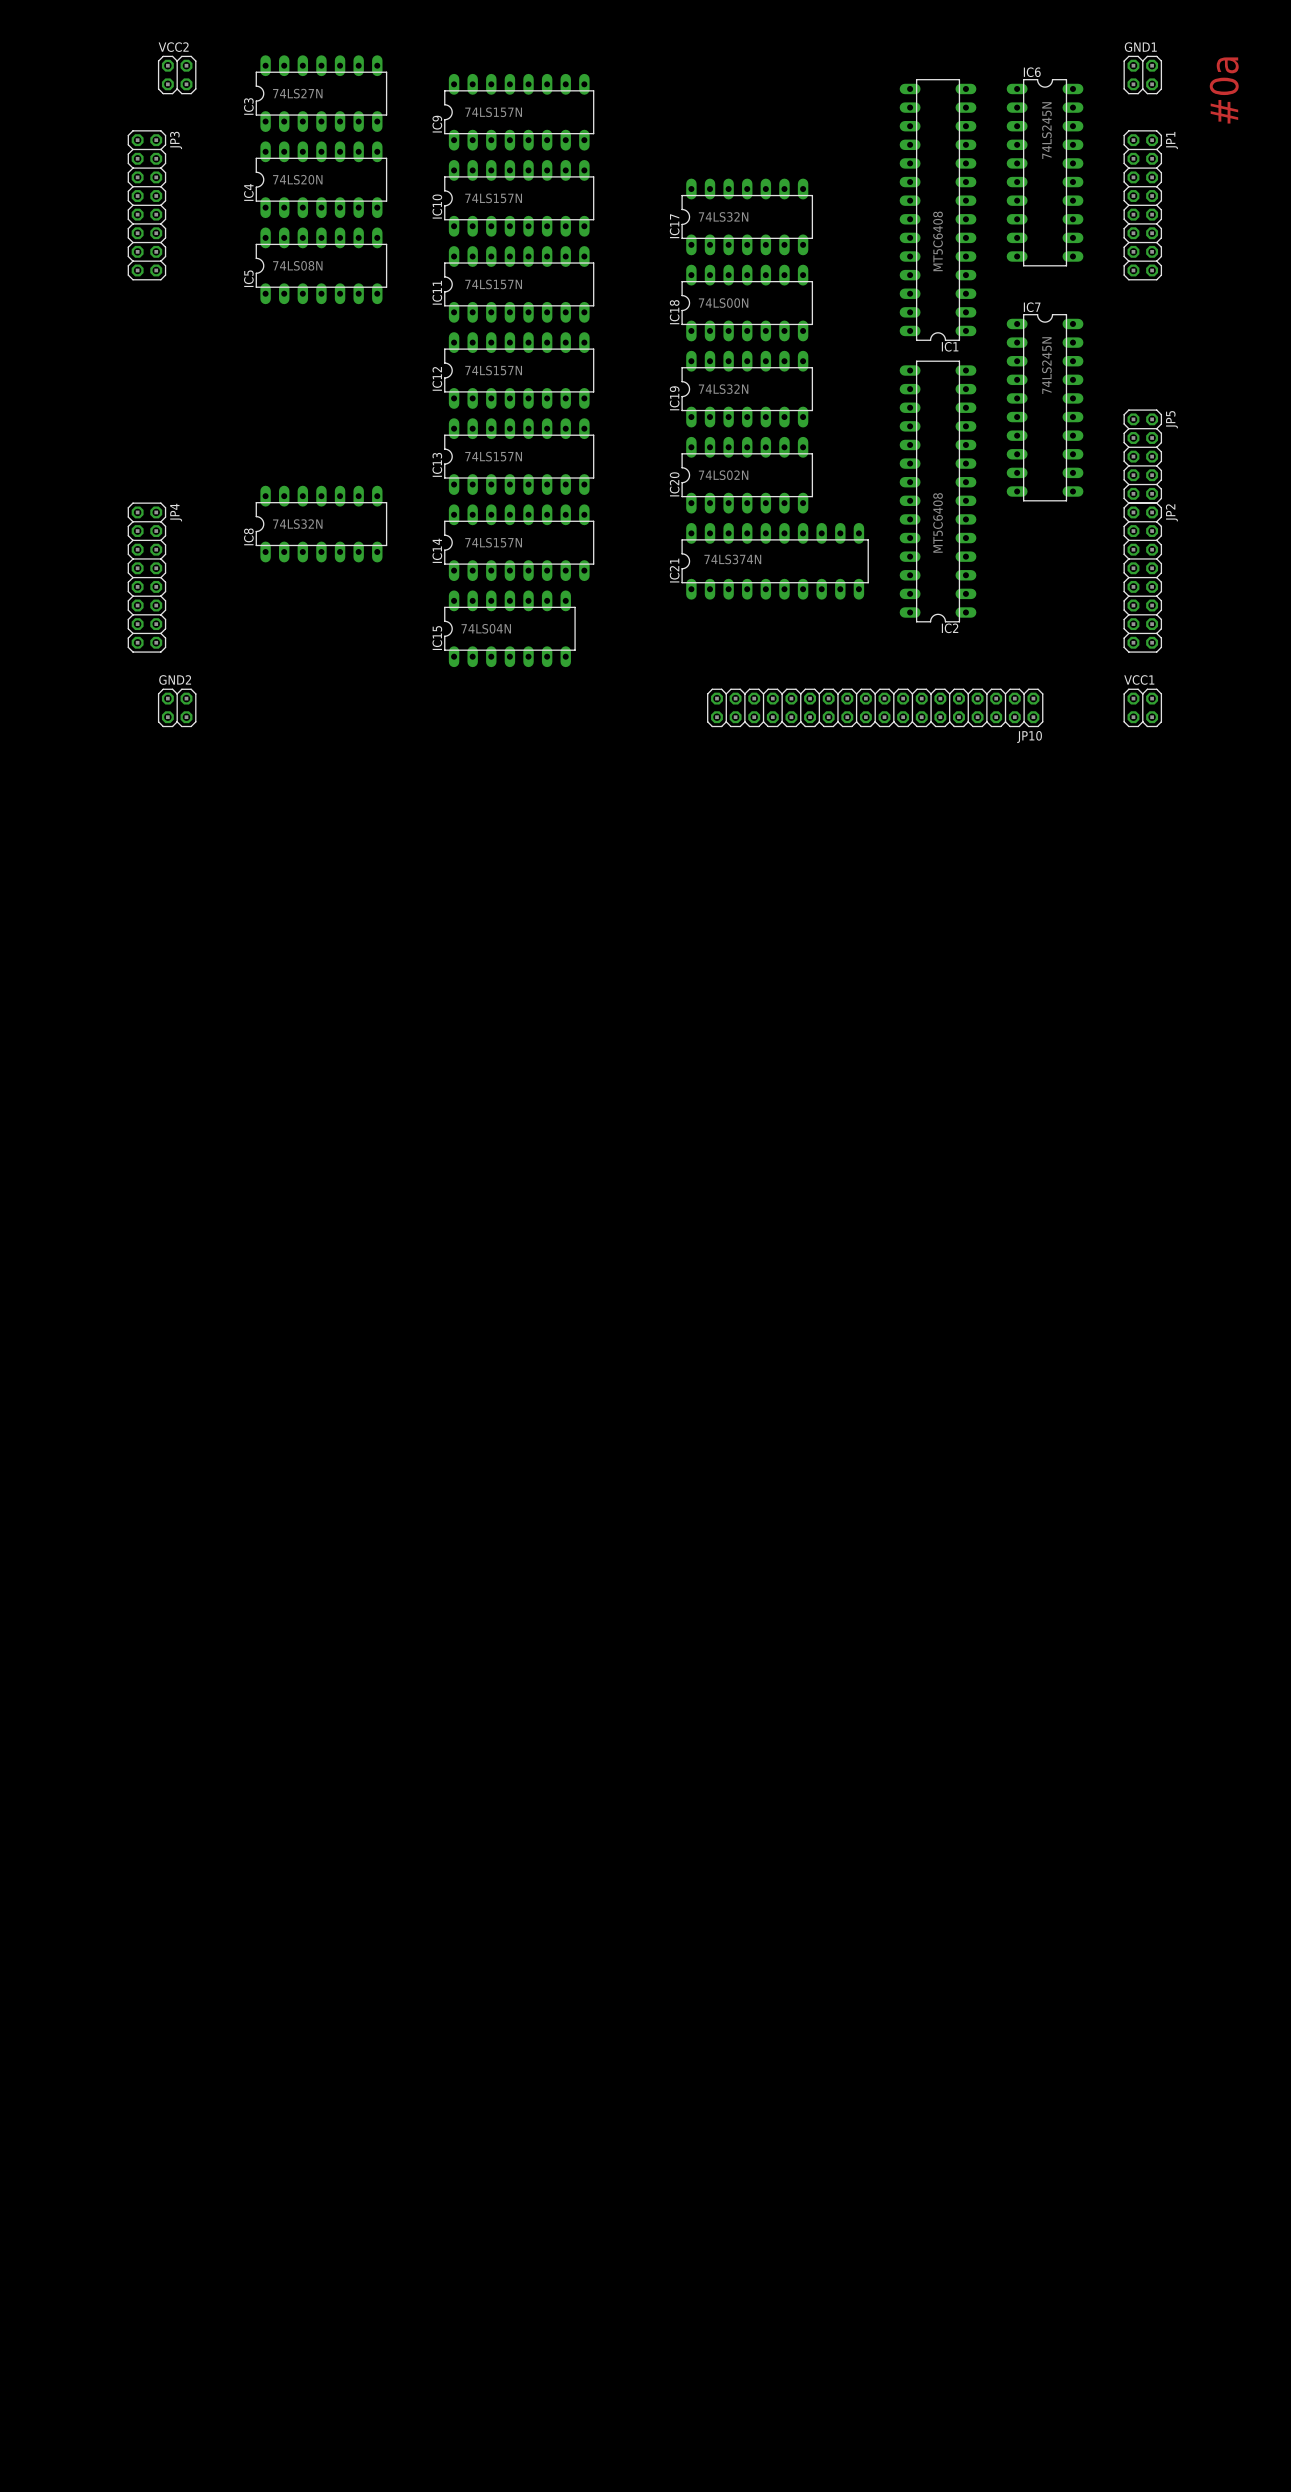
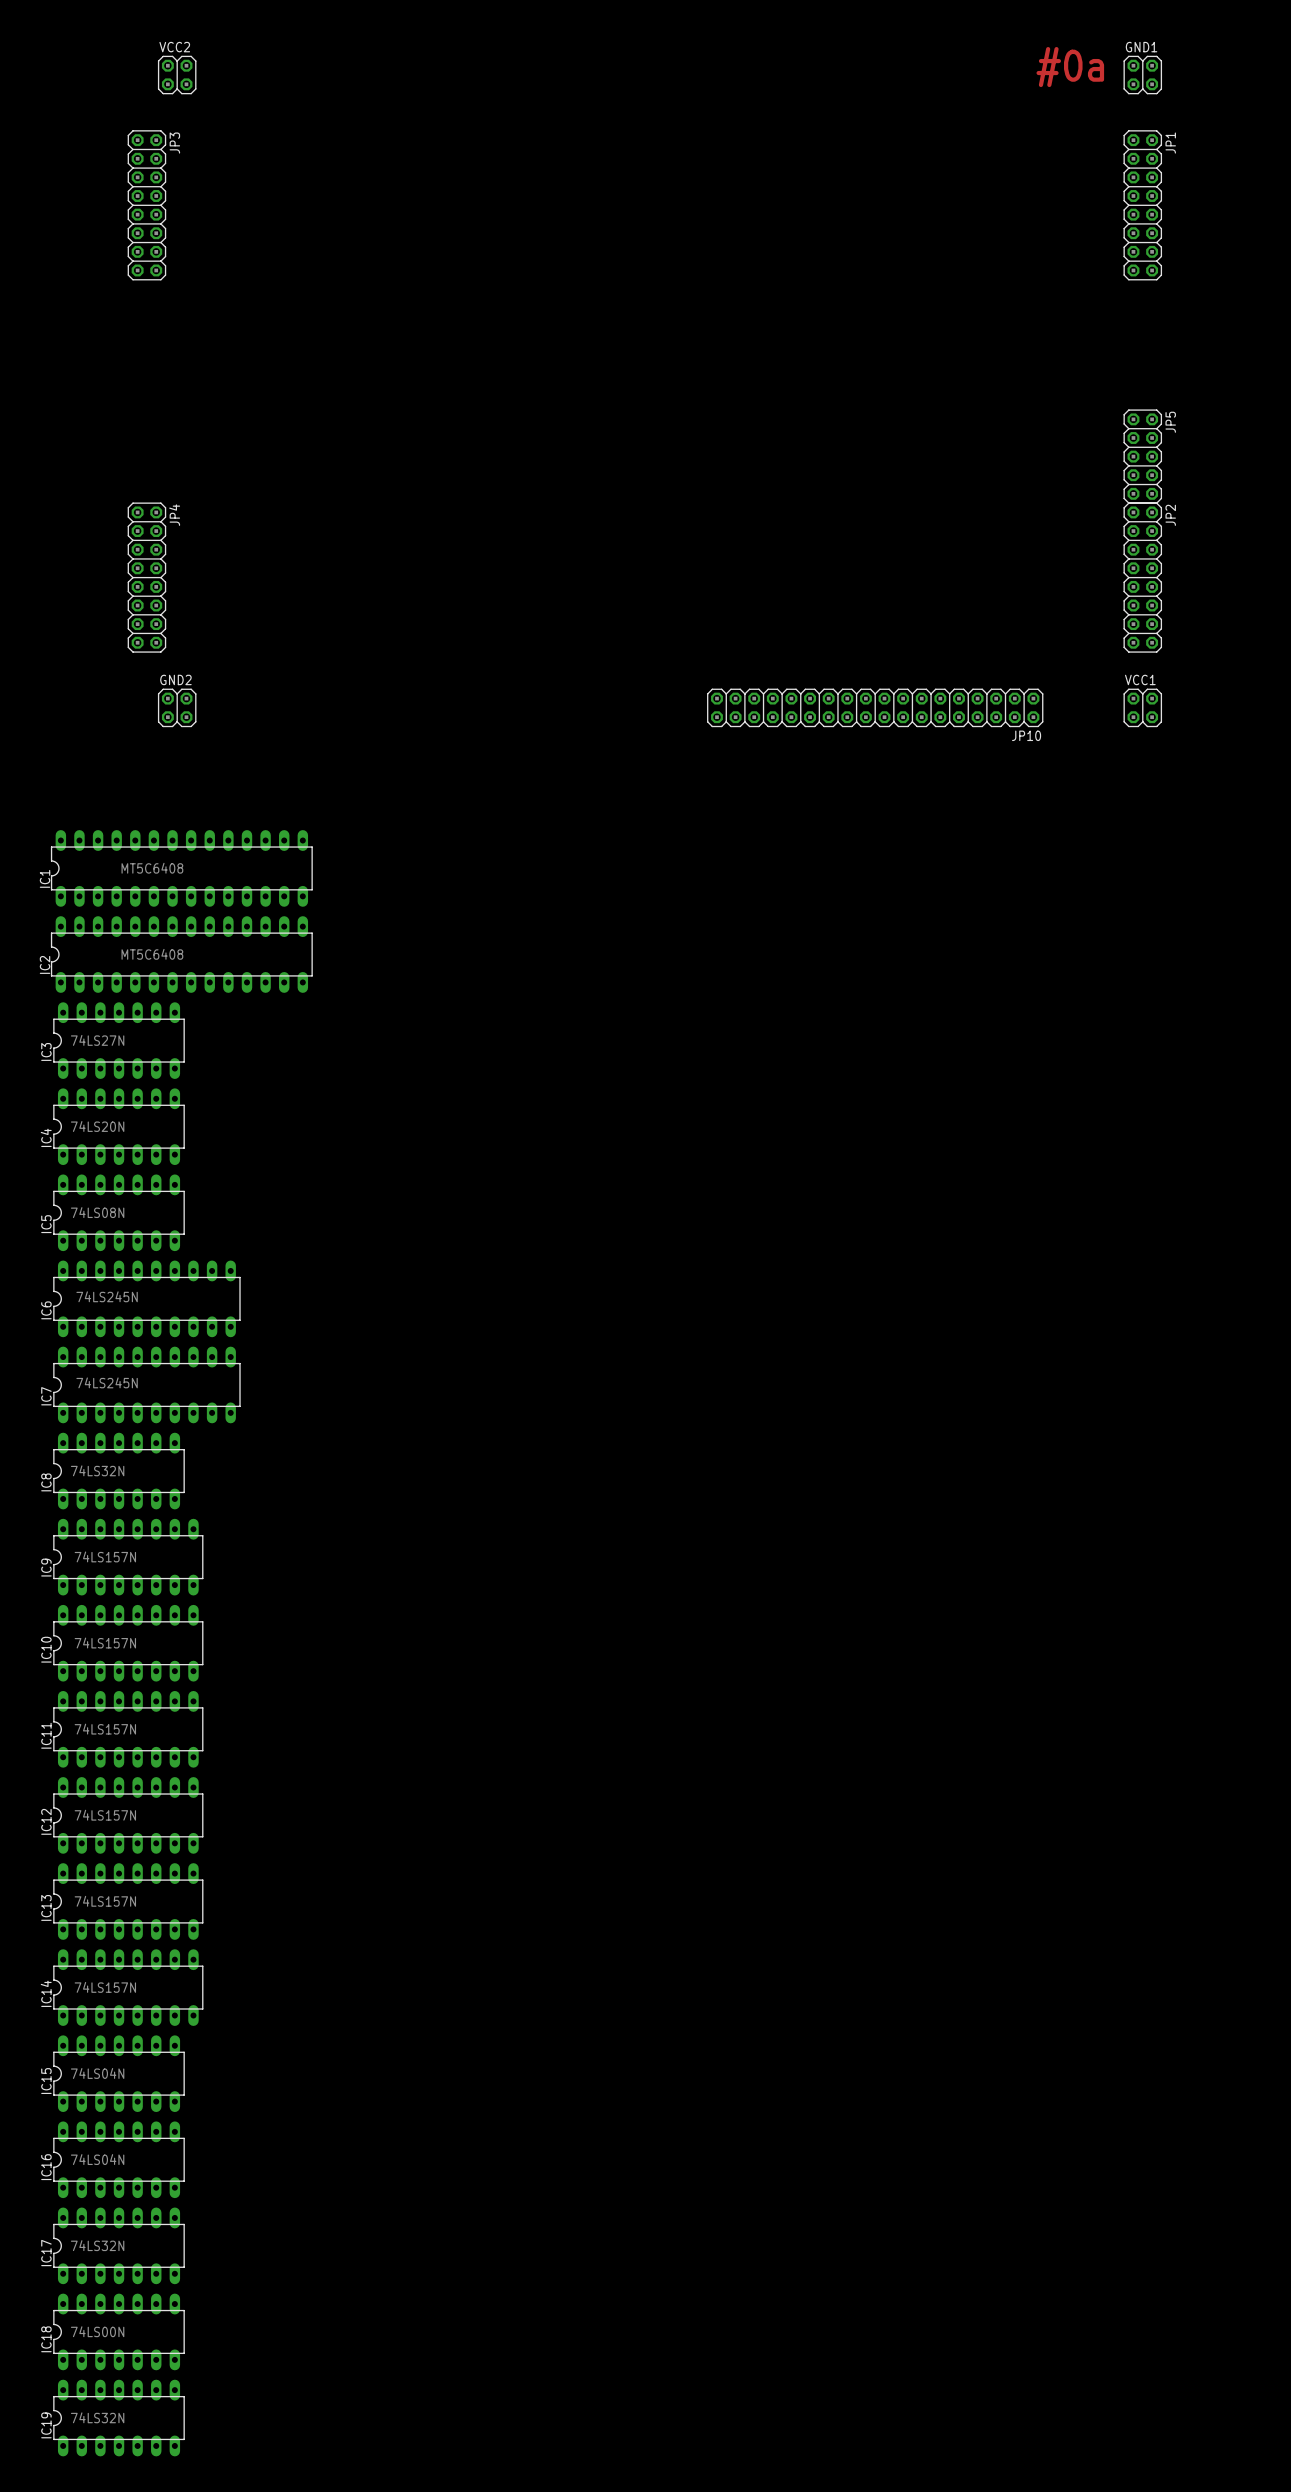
text: none -> #0a (1070, 67)
IC6 name position: IC6 (1032, 72) -> IC6 (46, 1310)
IC6 footprint: [1006, 79, 1084, 267] -> [53, 1260, 241, 1338]
text: #0a (1224, 90) -> none
IC3 position: (321, 93) -> (119, 1040)
IC9 position: (519, 112) -> (128, 1557)
IC6 value position: 74LS245N (1046, 130) -> 74LS245N (107, 1296)
IC17 footprint: [681, 178, 813, 256] -> [53, 2207, 185, 2285]
IC4 position: (321, 179) -> (119, 1126)
IC10 position: (519, 198) -> (128, 1643)
IC1 rotation: 0° (938, 209) -> 90° clockwise (181, 868)
IC1 position: (938, 209) -> (181, 868)
IC11 footprint: [444, 246, 595, 323] -> [53, 1690, 204, 1768]
IC5 position: (321, 265) -> (119, 1212)
IC18 position: (747, 303) -> (119, 2331)
IC7 name position: IC7 (1032, 307) -> IC7 (46, 1396)
IC7 footprint: [1006, 314, 1084, 502] -> [53, 1346, 241, 1424]
IC19 footprint: [681, 350, 813, 428] -> [53, 2379, 185, 2457]
IC7 value position: 74LS245N (1046, 365) -> 74LS245N (107, 1382)
IC12 position: (519, 370) -> (128, 1815)
IC13 position: (519, 456) -> (128, 1901)
IC20: 74LS02N (747, 475) -> none
IC2 rotation: 0° (938, 491) -> 90° clockwise (181, 954)
IC2 position: (938, 491) -> (181, 954)
IC8 position: (321, 524) -> (119, 1471)
IC14 position: (519, 542) -> (128, 1987)
IC21: 74LS374N (775, 561) -> none
IC15 position: (509, 628) -> (119, 2073)
IC16: none -> 74LS04N (119, 2159)

